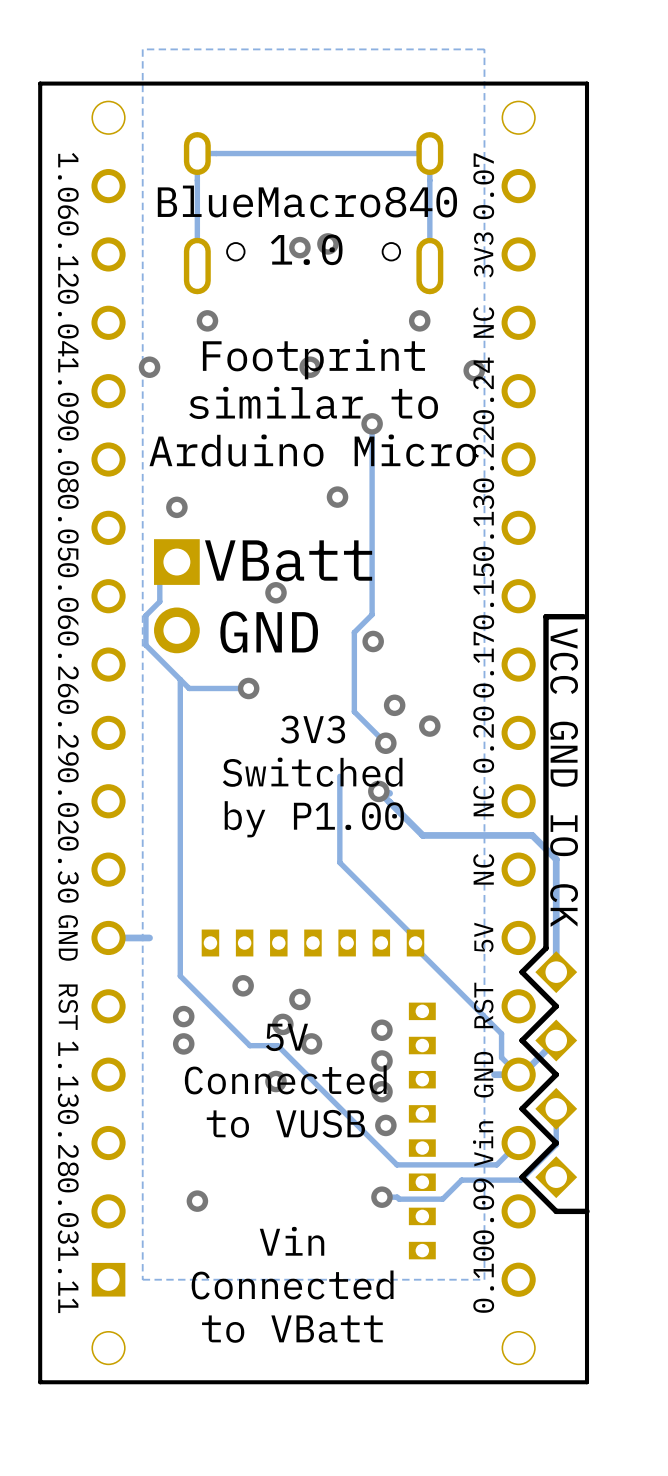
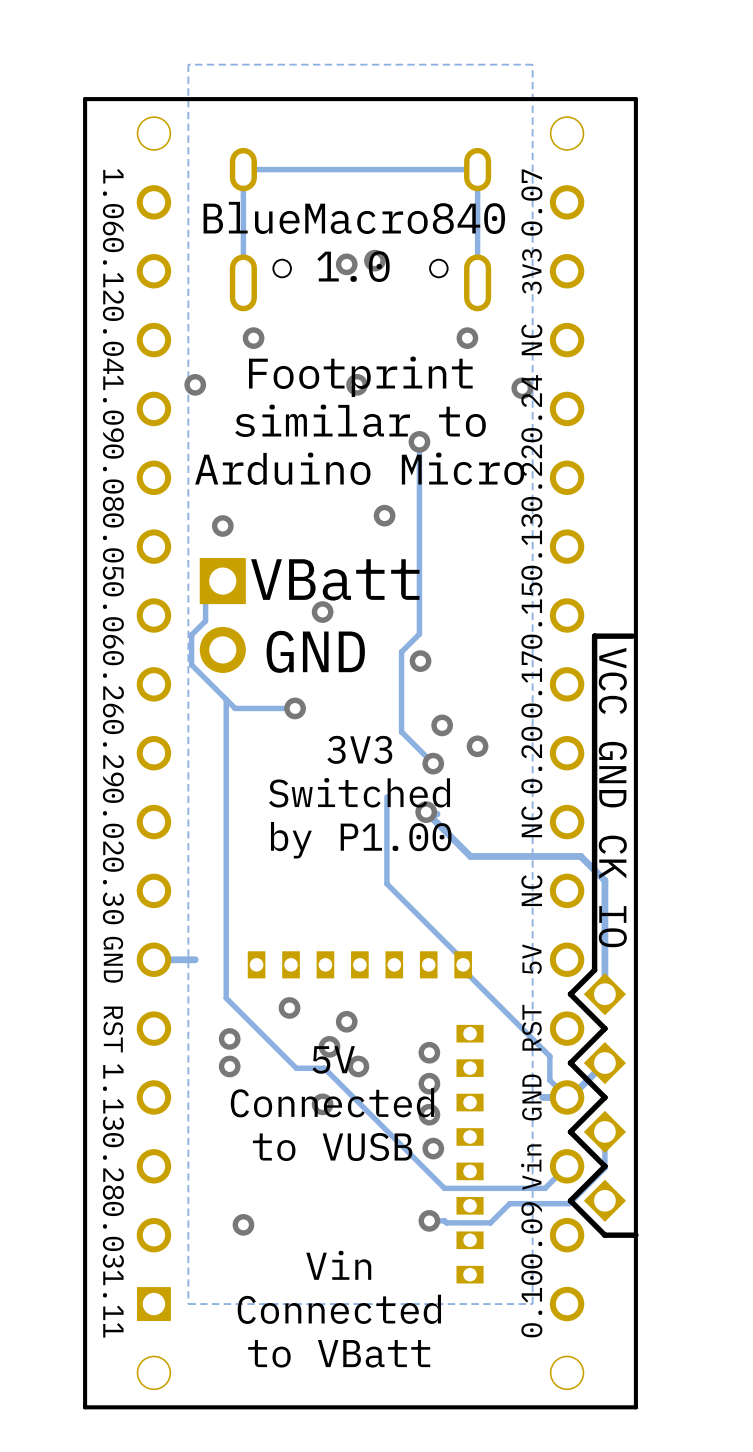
text: VCC GND IO CK (564, 777) -> VCC GND CK IO (612, 797)

